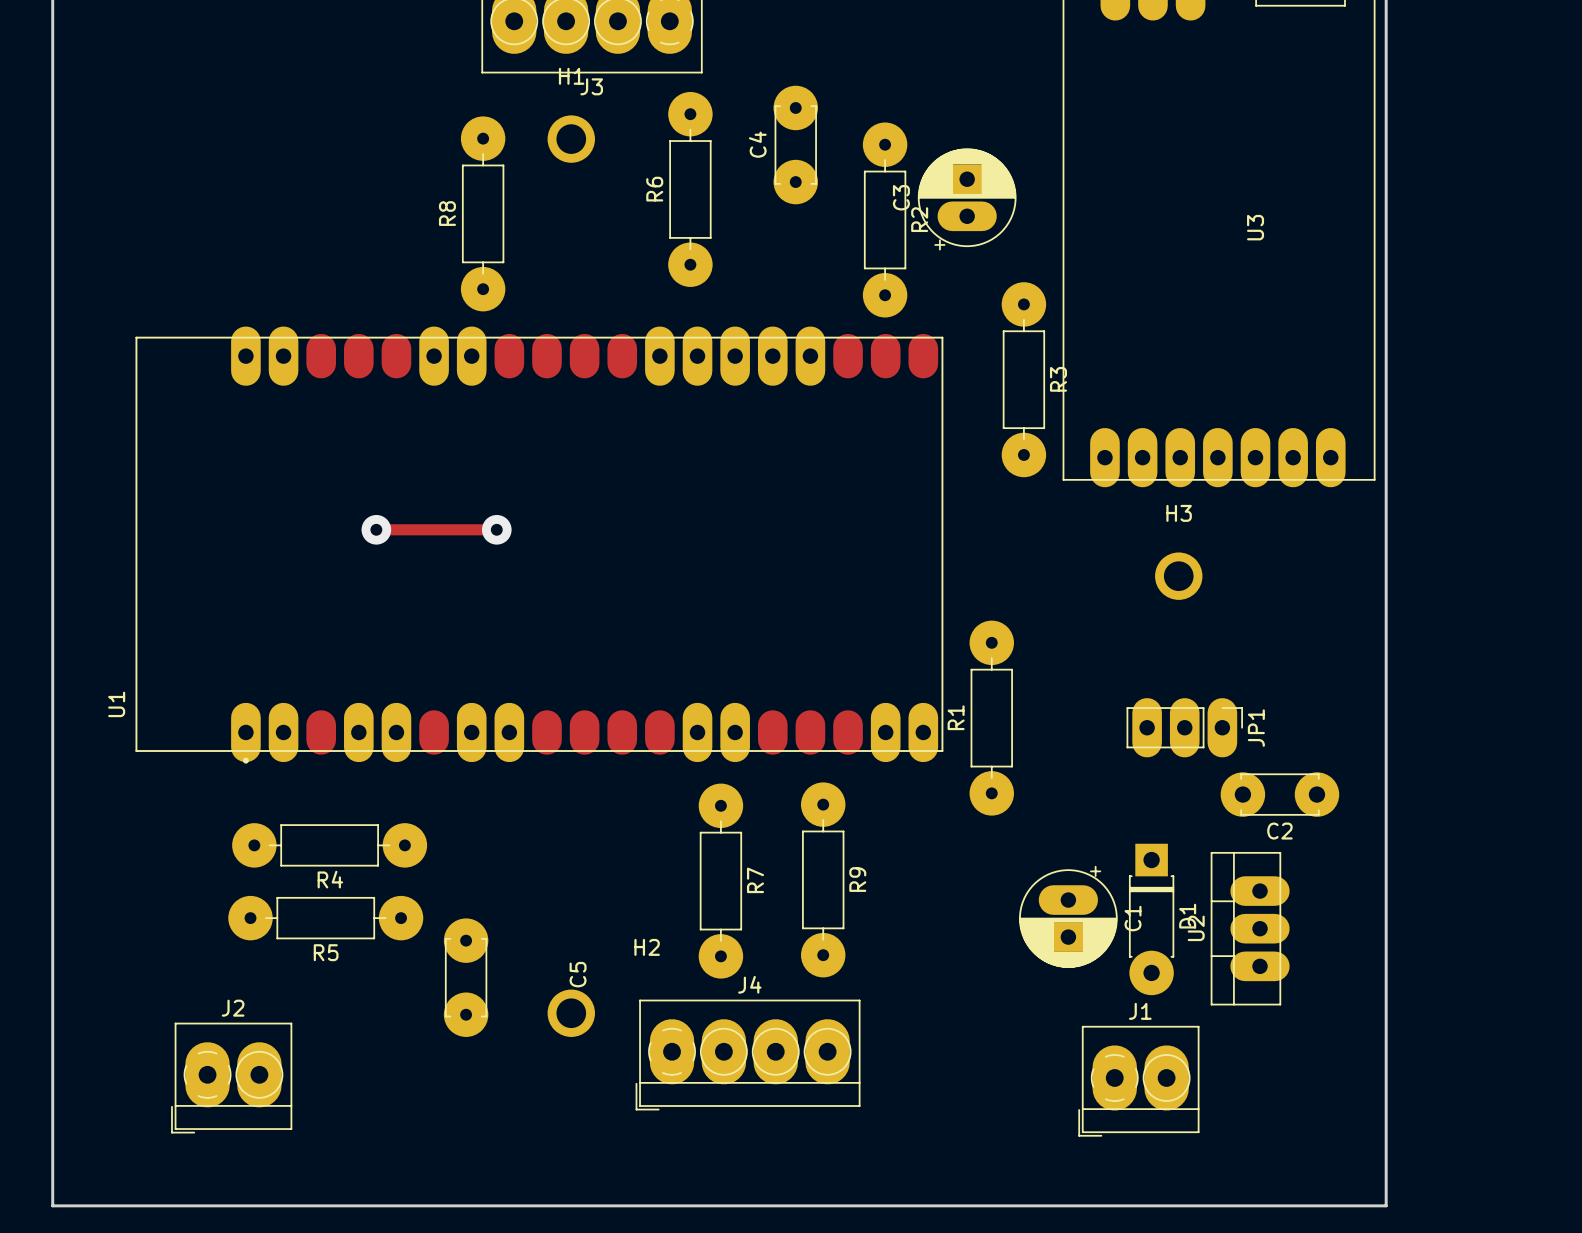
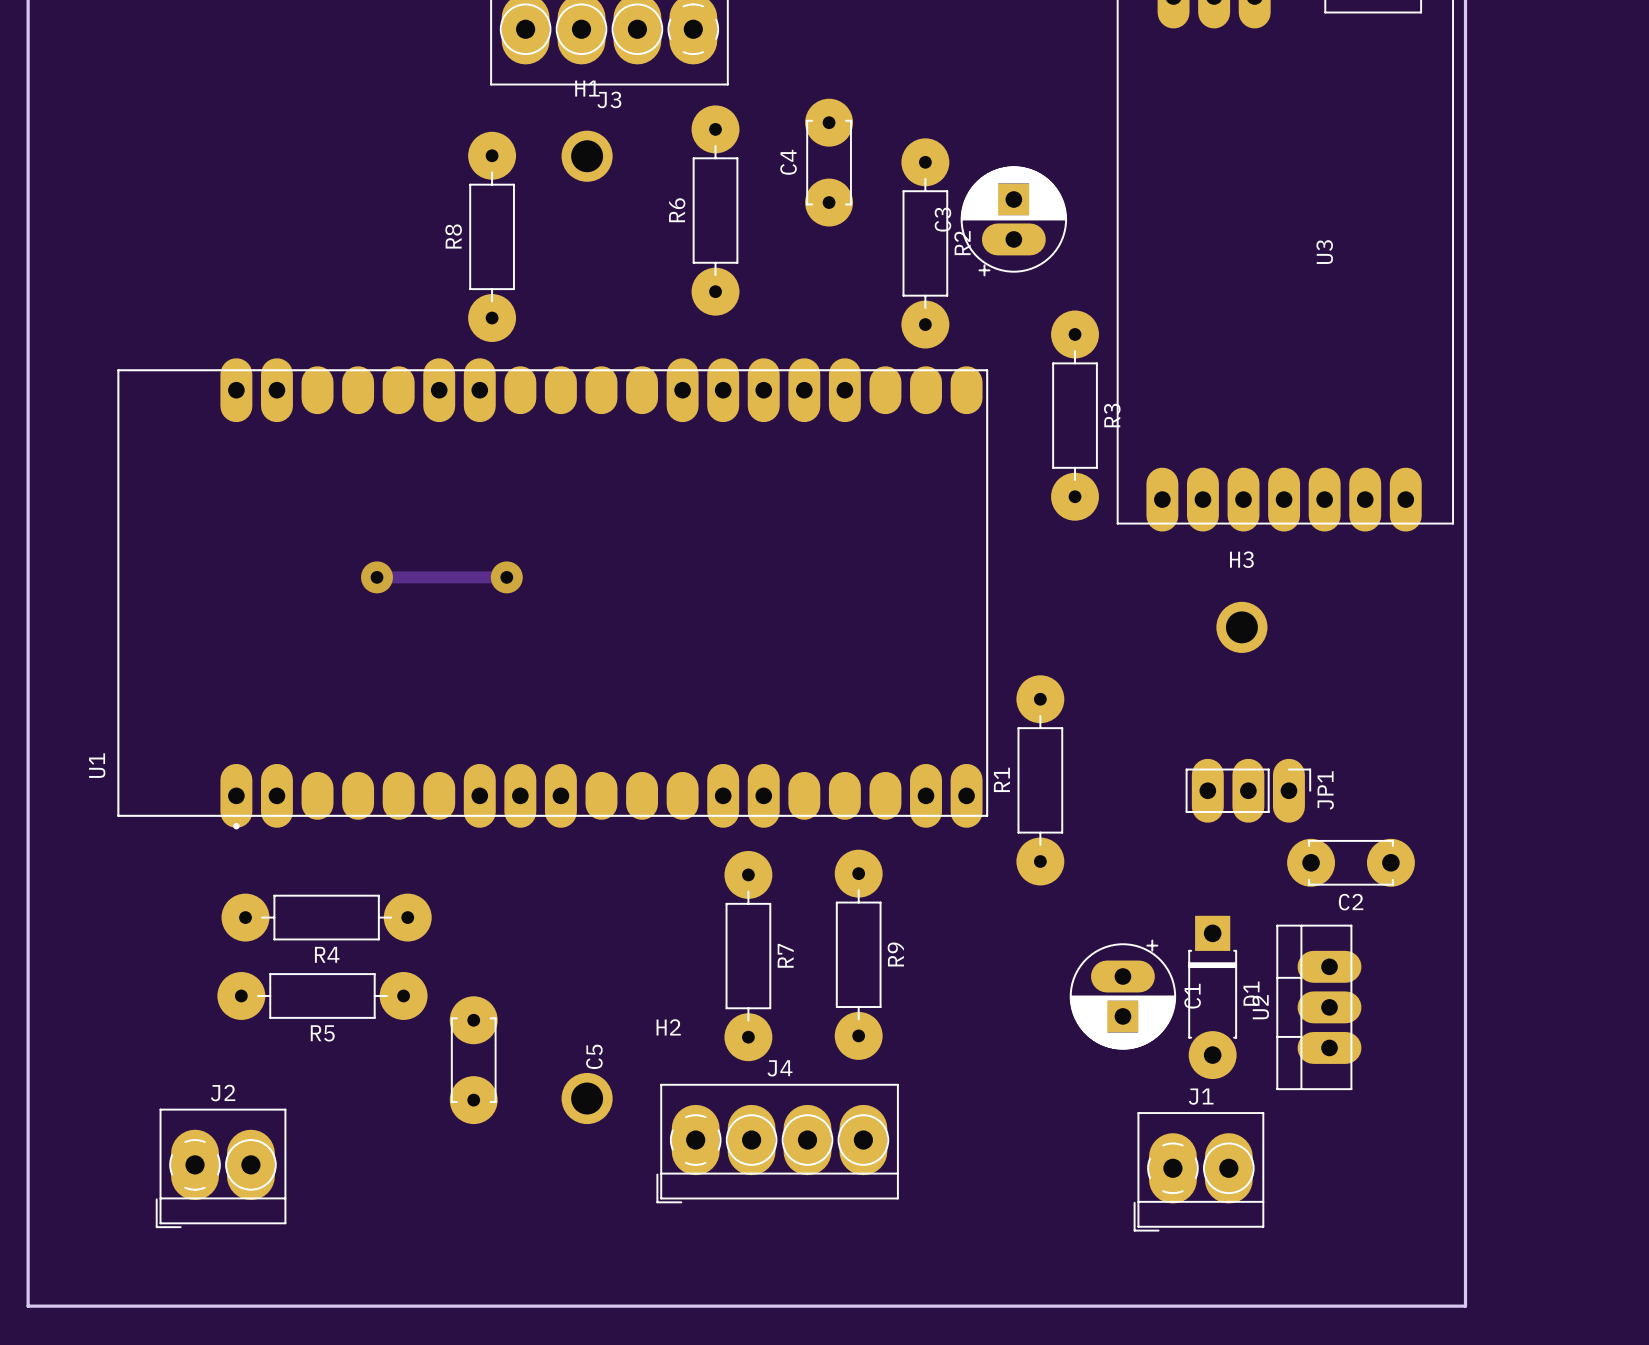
U1 footprint: [135, 326, 944, 764] -> [117, 358, 989, 830]

